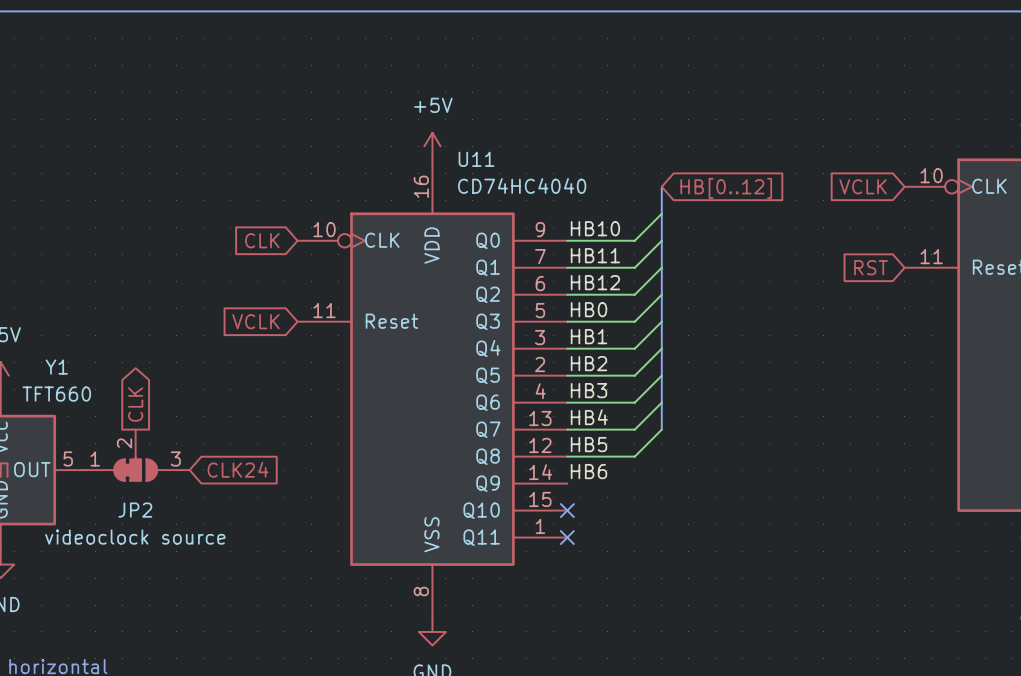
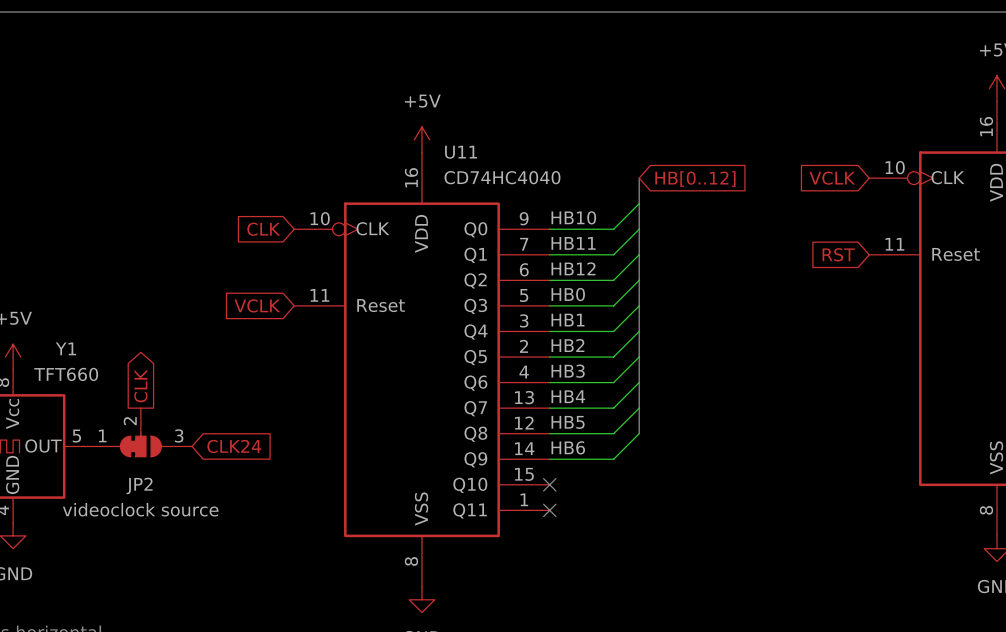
bus: none -> (639, 408) (639, 433)
wire: none -> (639, 433) (613, 459) (549, 459)

